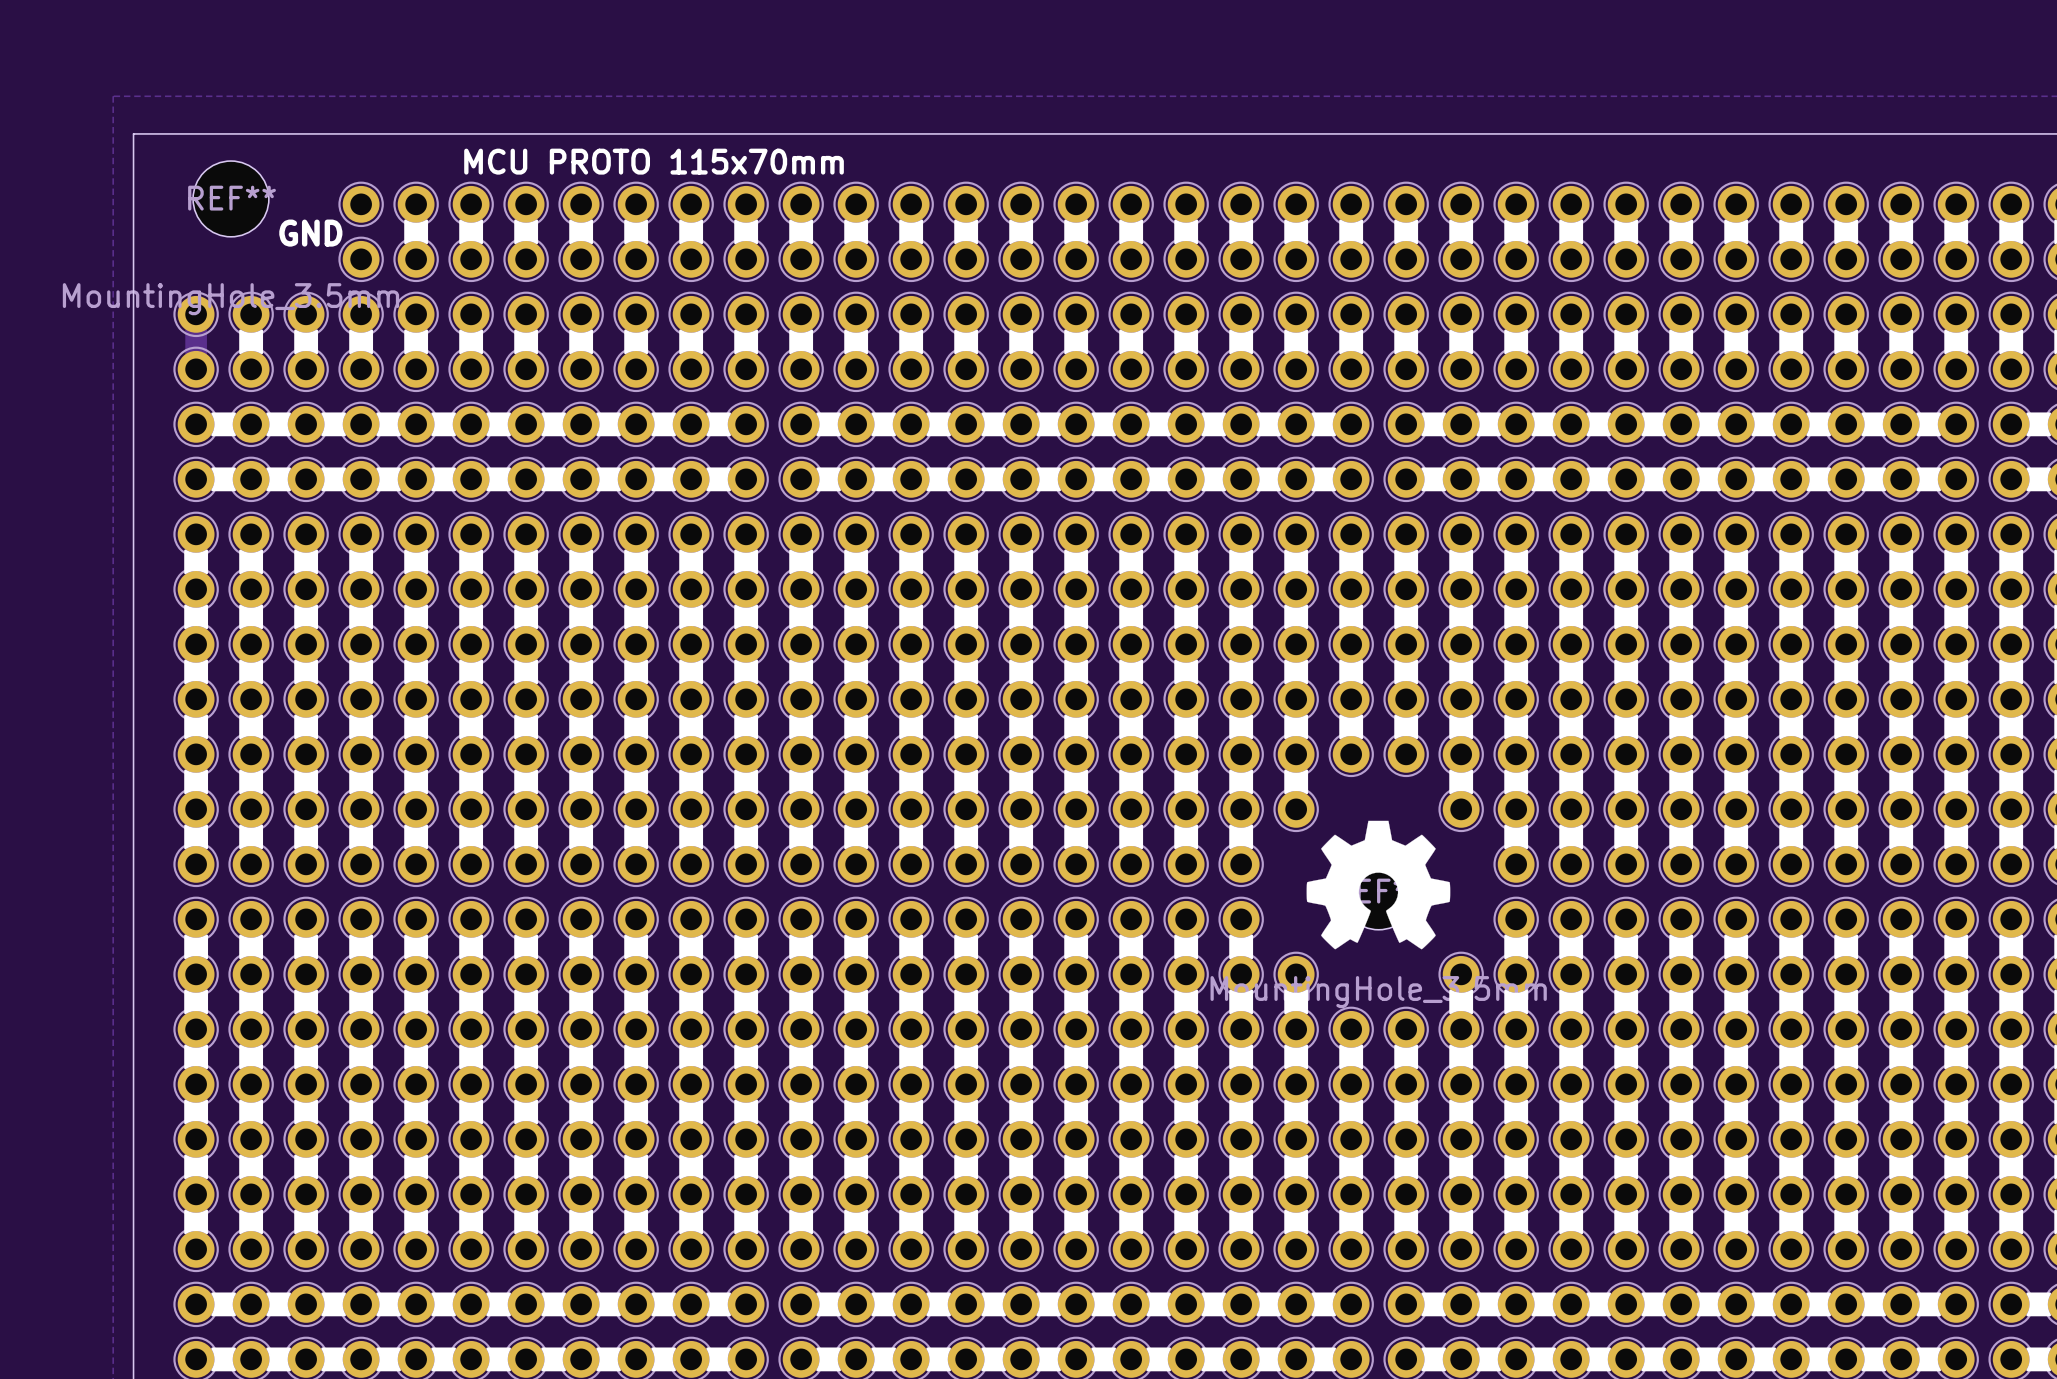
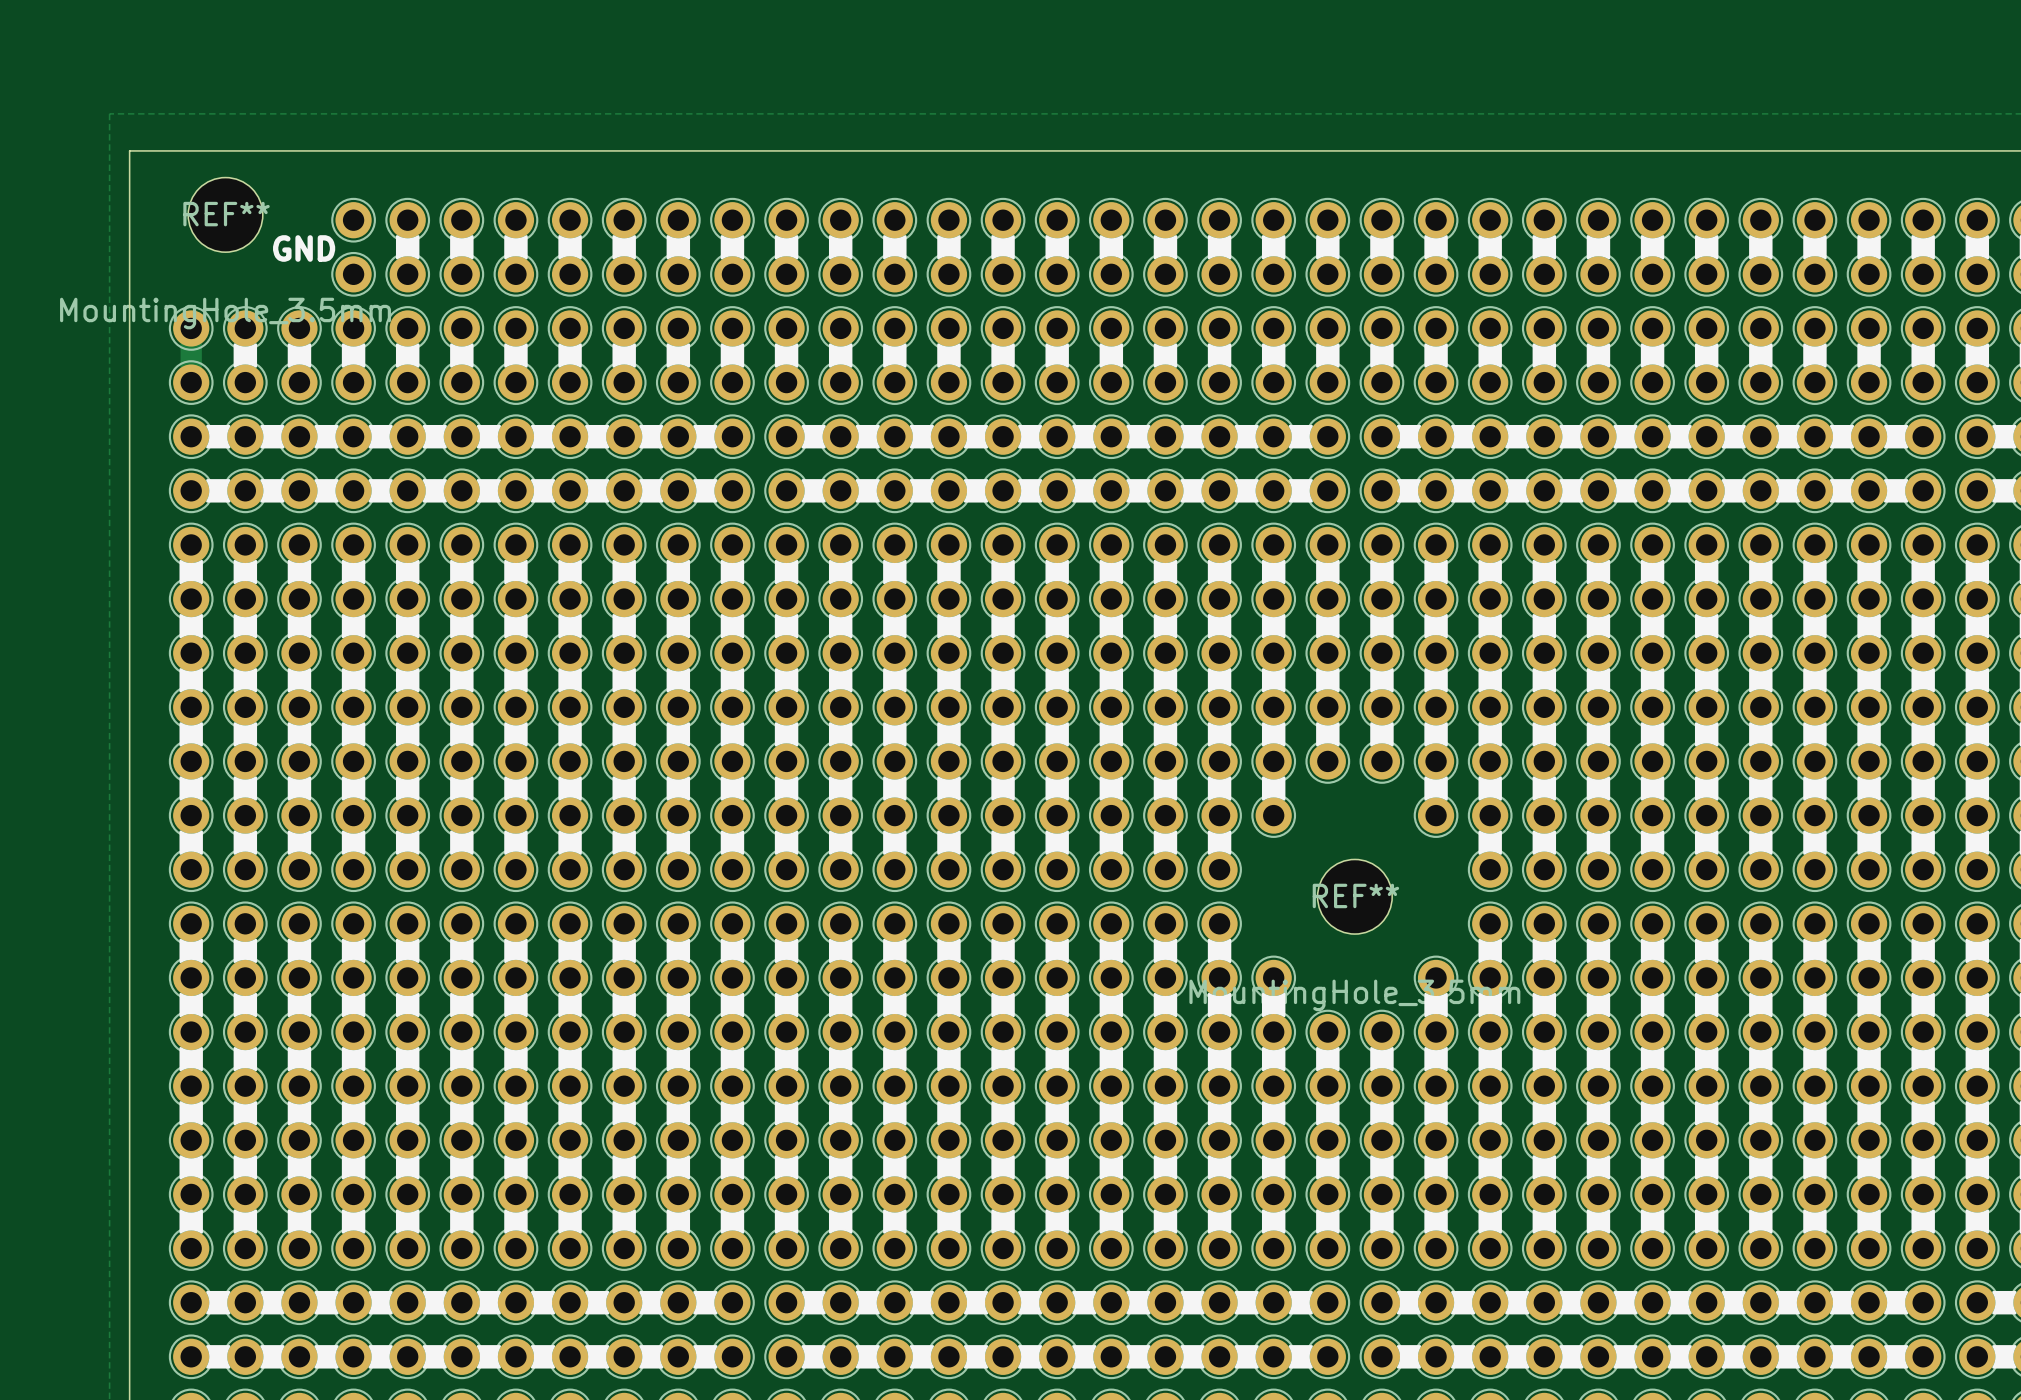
text: MCU PROTO 115x70mm (654, 161) -> none
drawing: [1306, 820, 1451, 950] -> none

